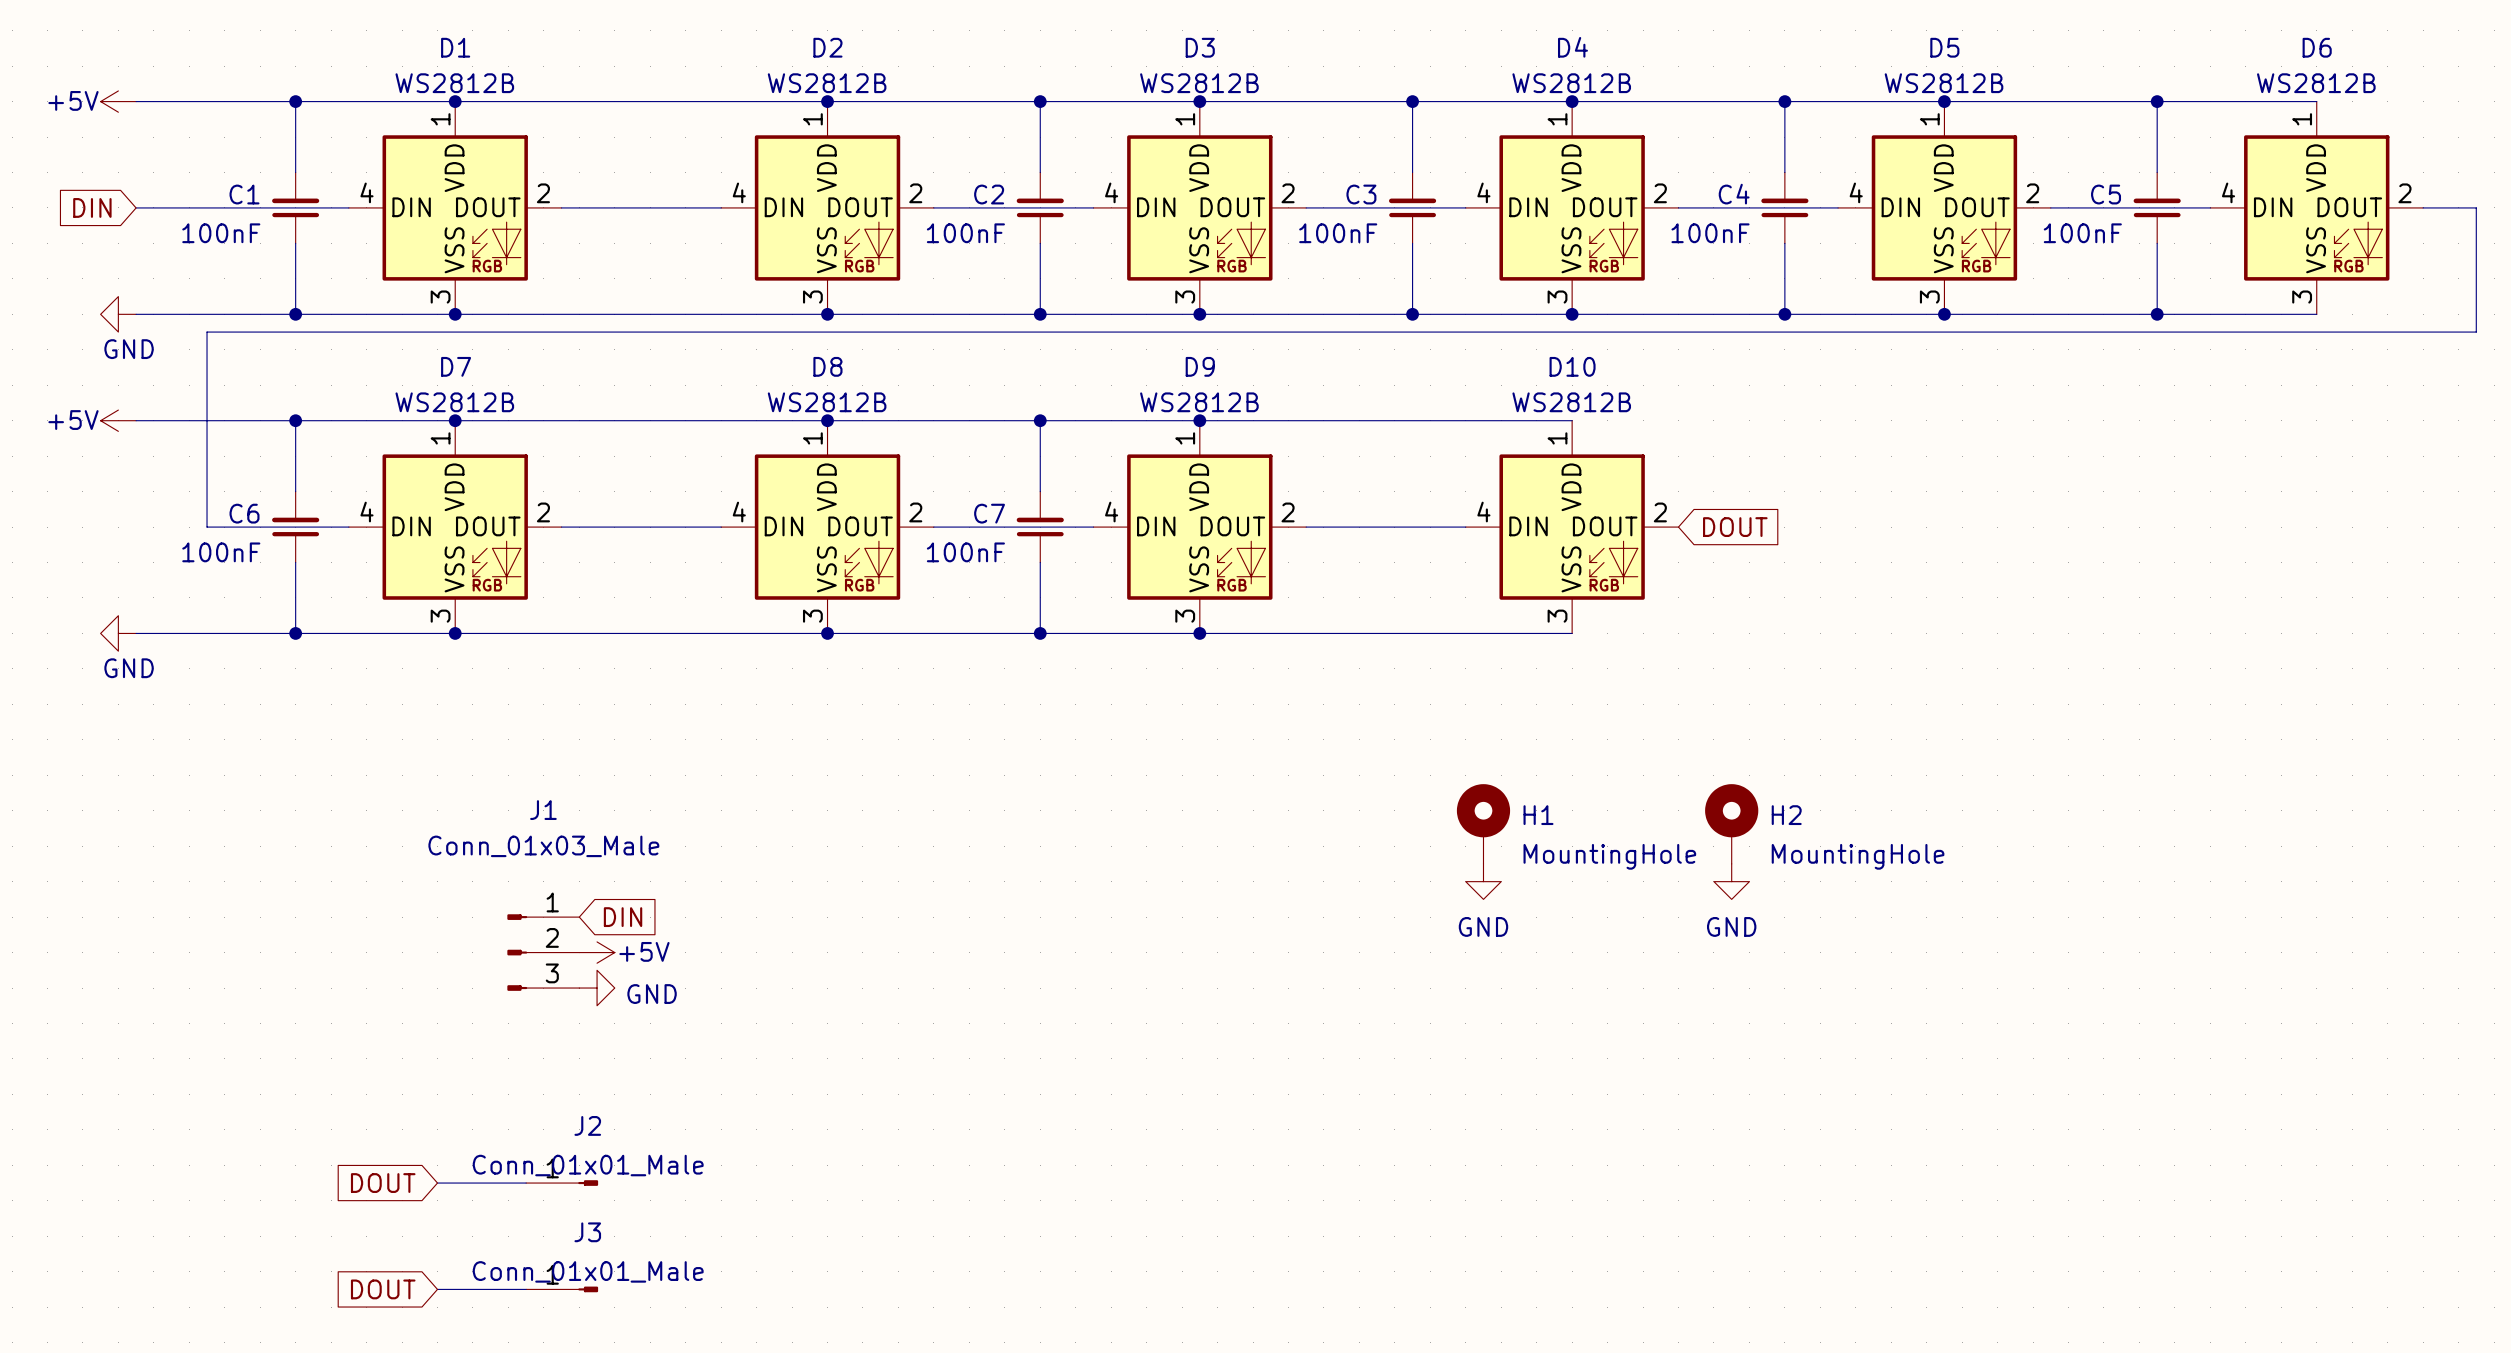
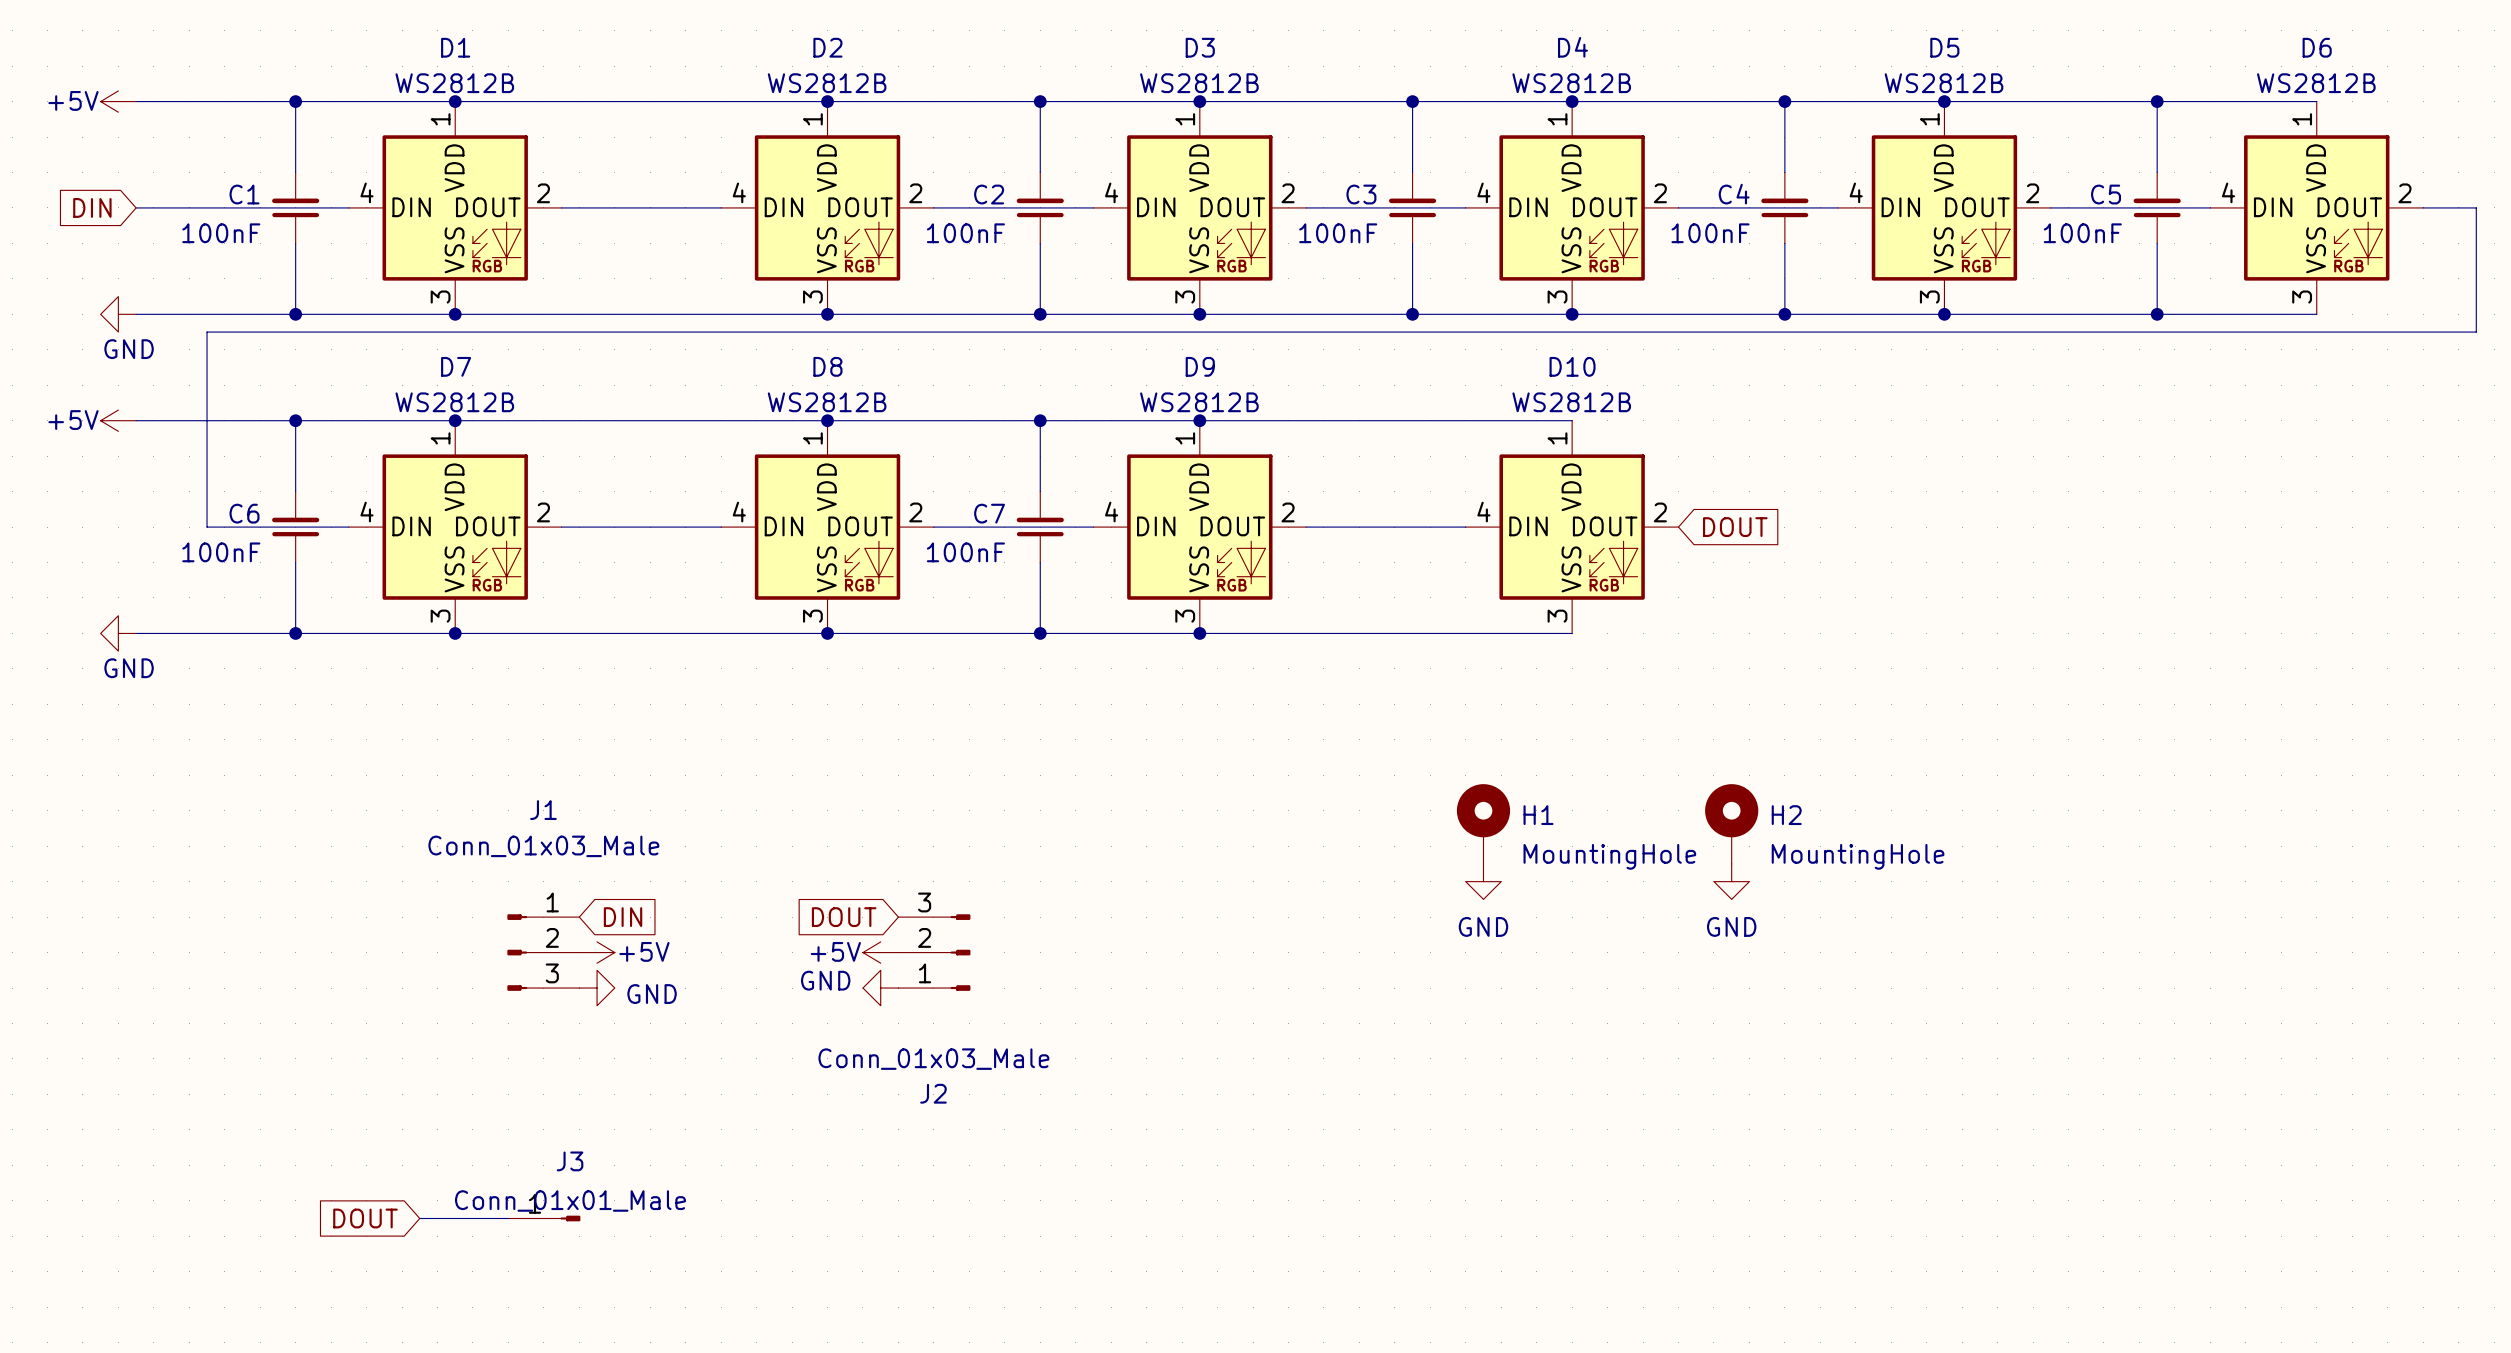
global label: none -> DOUT (844, 917)
power symbol: none -> +5V (880, 952)
power symbol: none -> GND (880, 988)
J2 name position: J2 (587, 1125) -> J2 (933, 1093)
J2 value: Conn_01x01_Male (588, 1165) -> Conn_01x03_Male (933, 1059)
J2 symbol: [526, 1180, 599, 1186] -> [898, 914, 971, 991]
global label position: DOUT (383, 1183) -> DOUT (365, 1218)
wire: (437, 1183) (526, 1183) -> (419, 1218) (508, 1218)
global label: DOUT (383, 1289) -> none
wire: (437, 1289) (526, 1289) -> none
J3 position: (562, 1289) -> (544, 1218)

